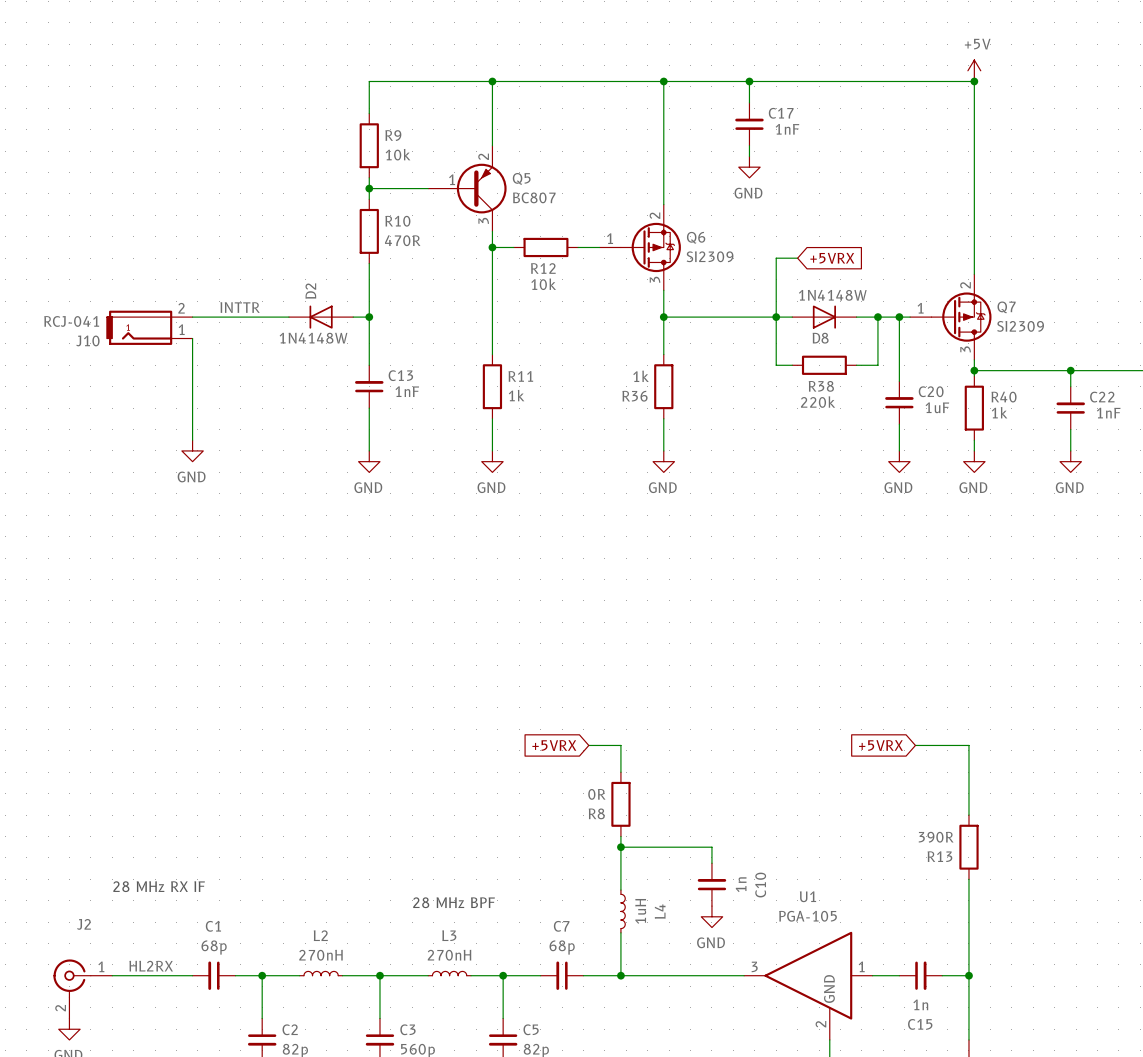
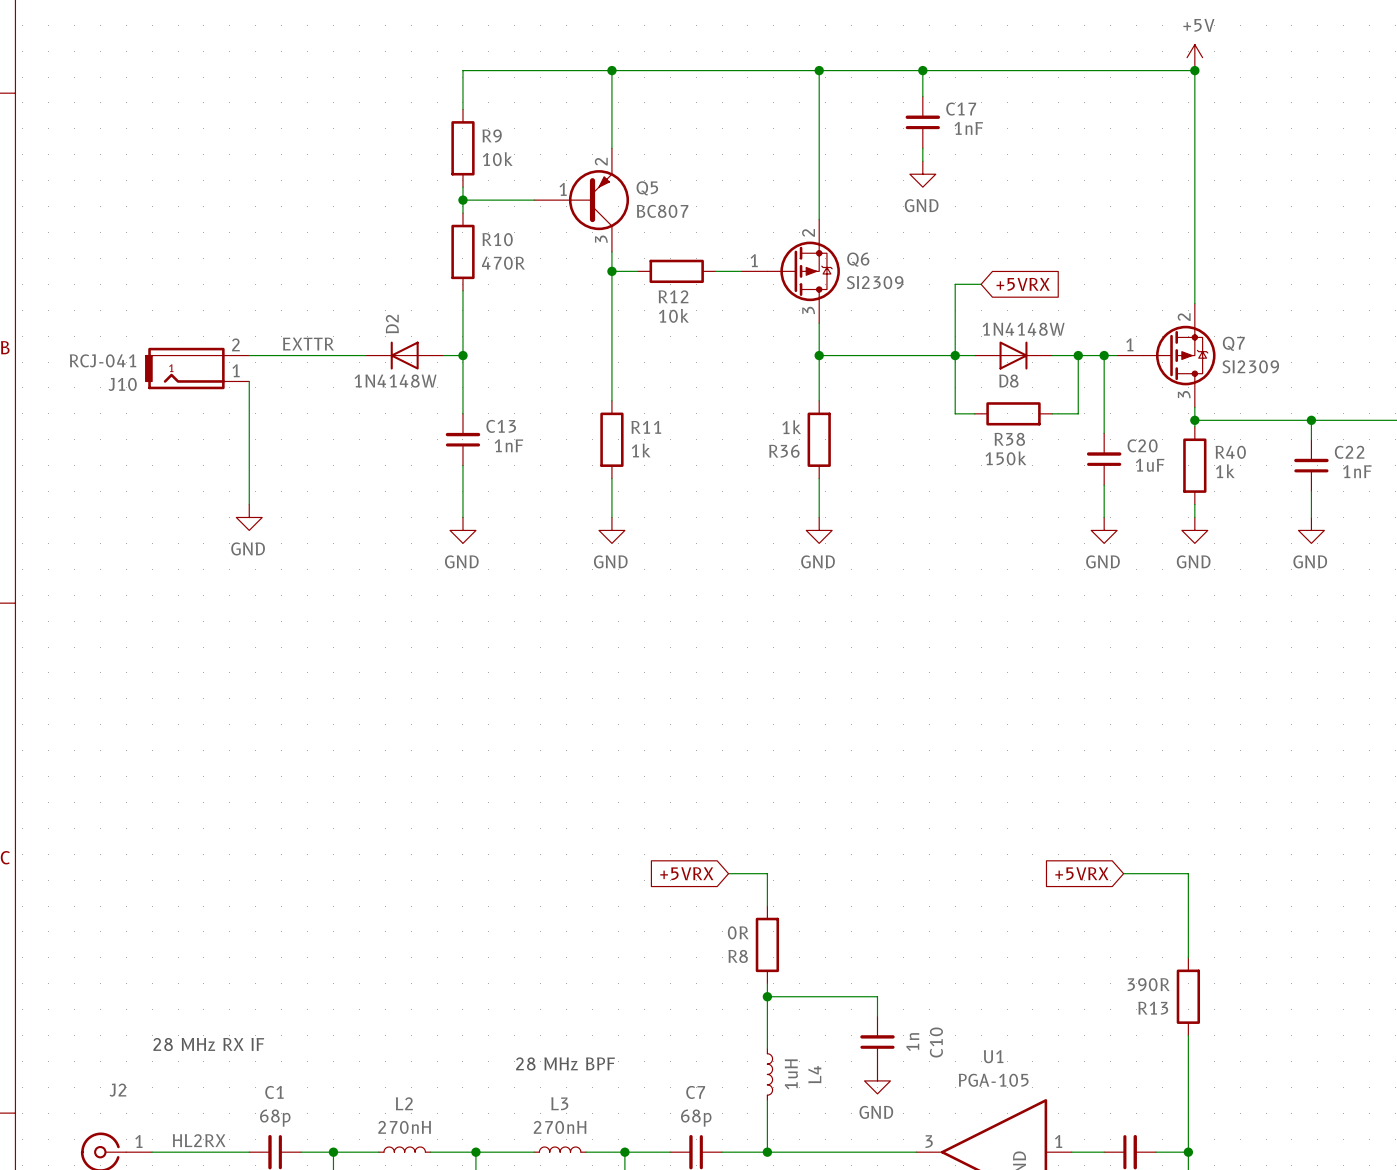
label: INTTR (240, 307) -> EXTTR (308, 344)
R38 value: 220k (818, 402) -> 150k (1005, 458)

